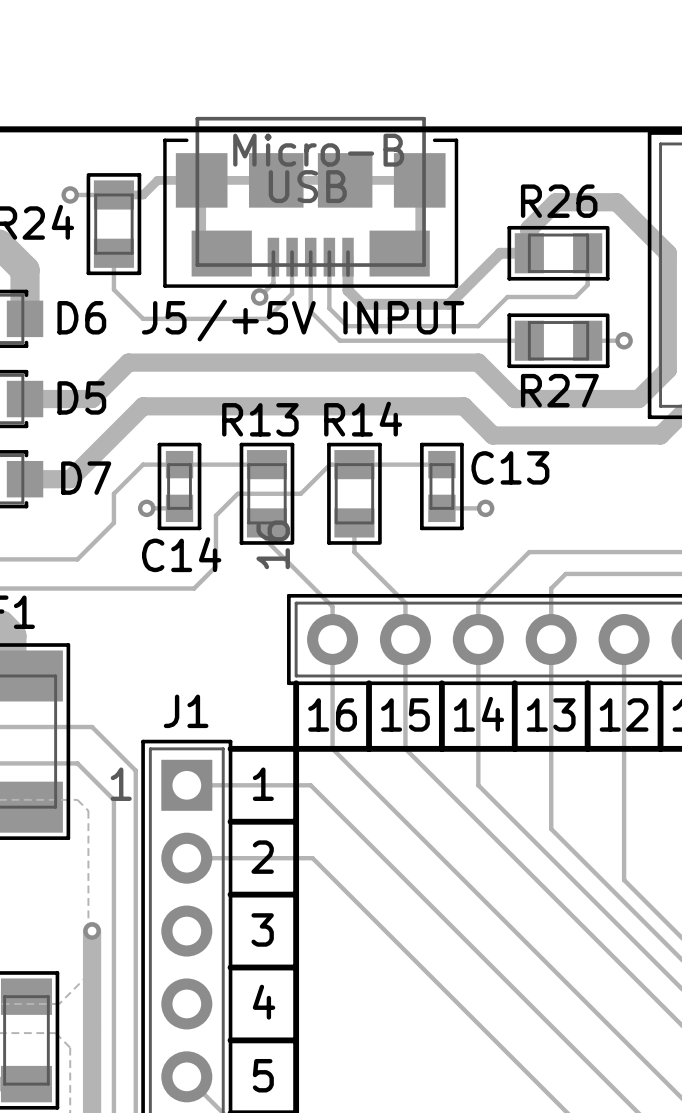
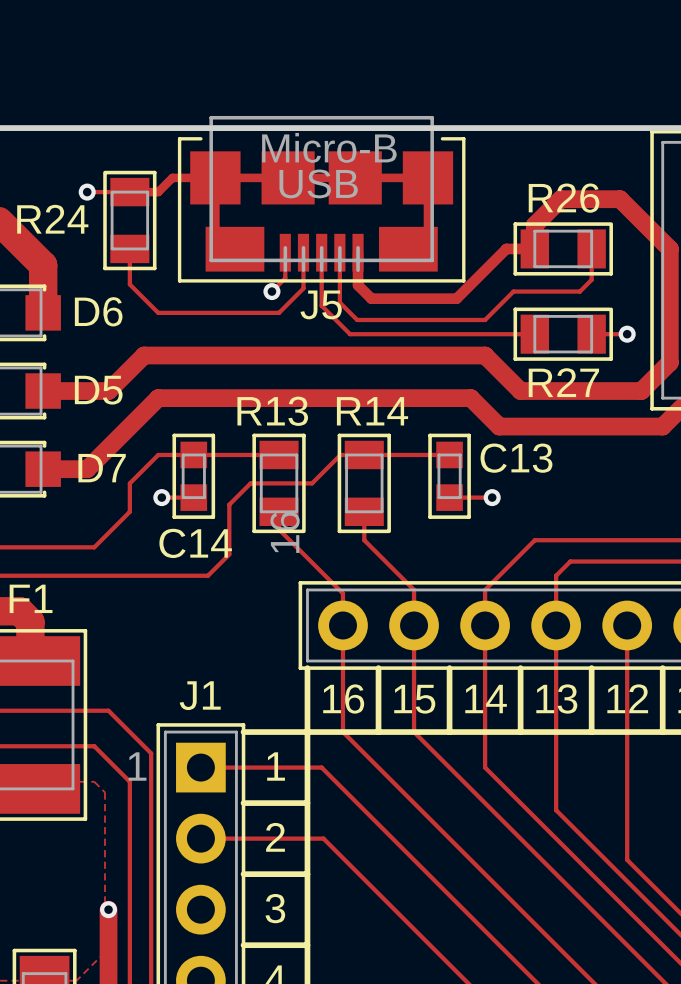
J5 name position: J5 (164, 317) -> J5 (321, 304)
text: /+5V INPUT (330, 320) -> none

